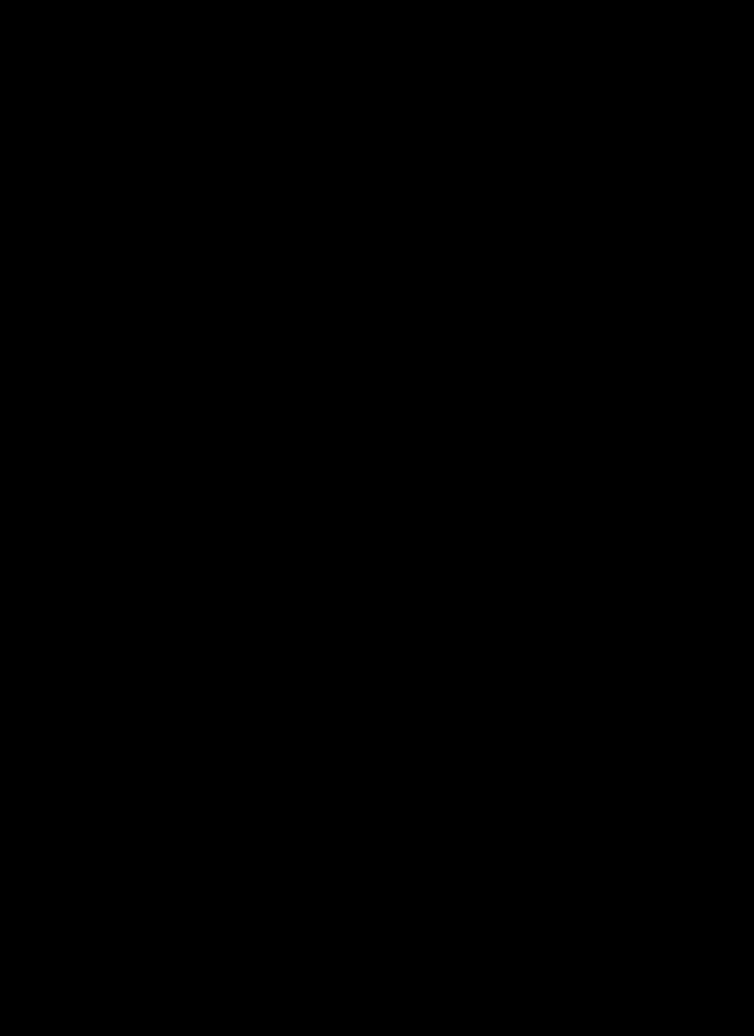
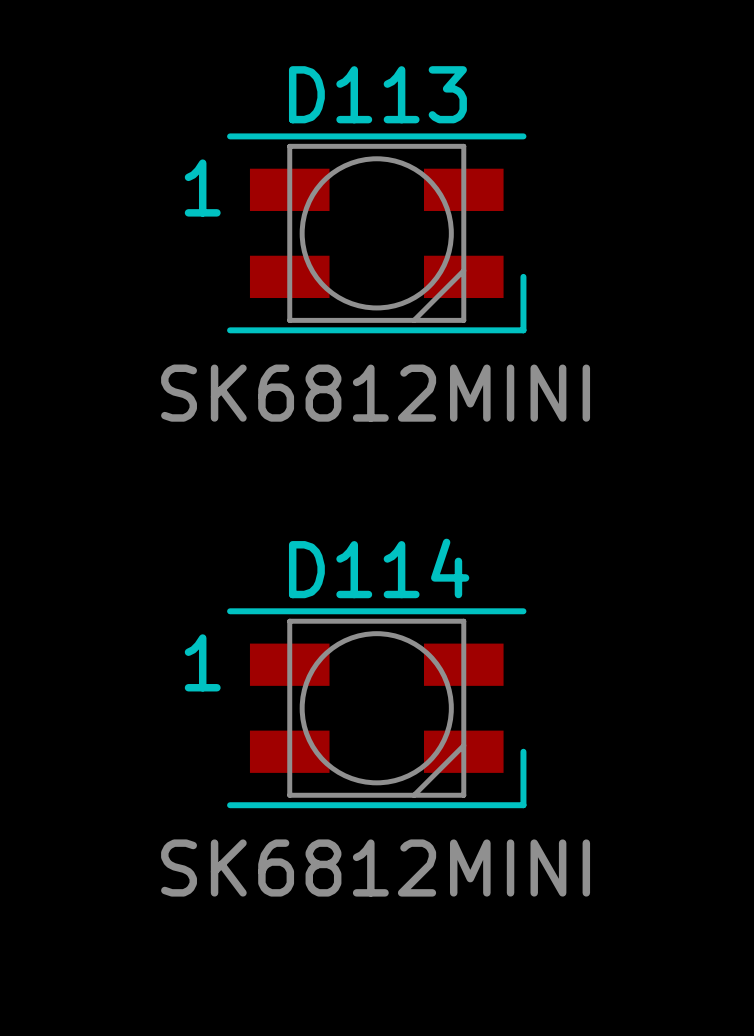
D113: none -> SK6812MINI (376, 233)
D114: none -> SK6812MINI (376, 708)

